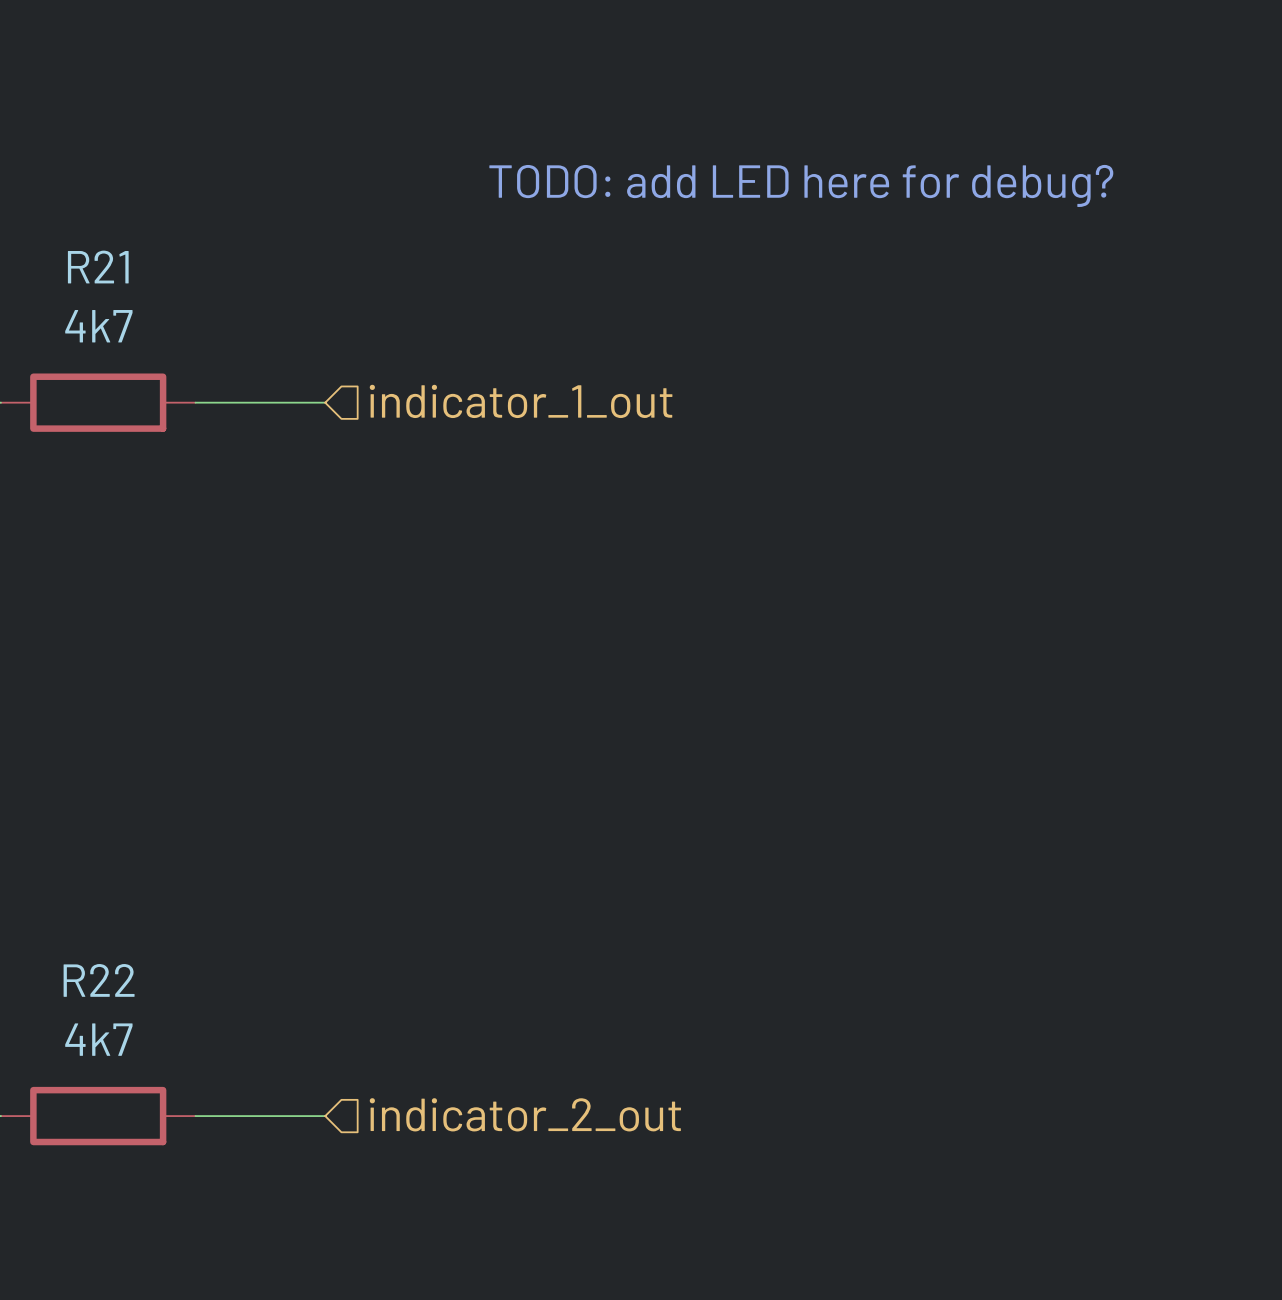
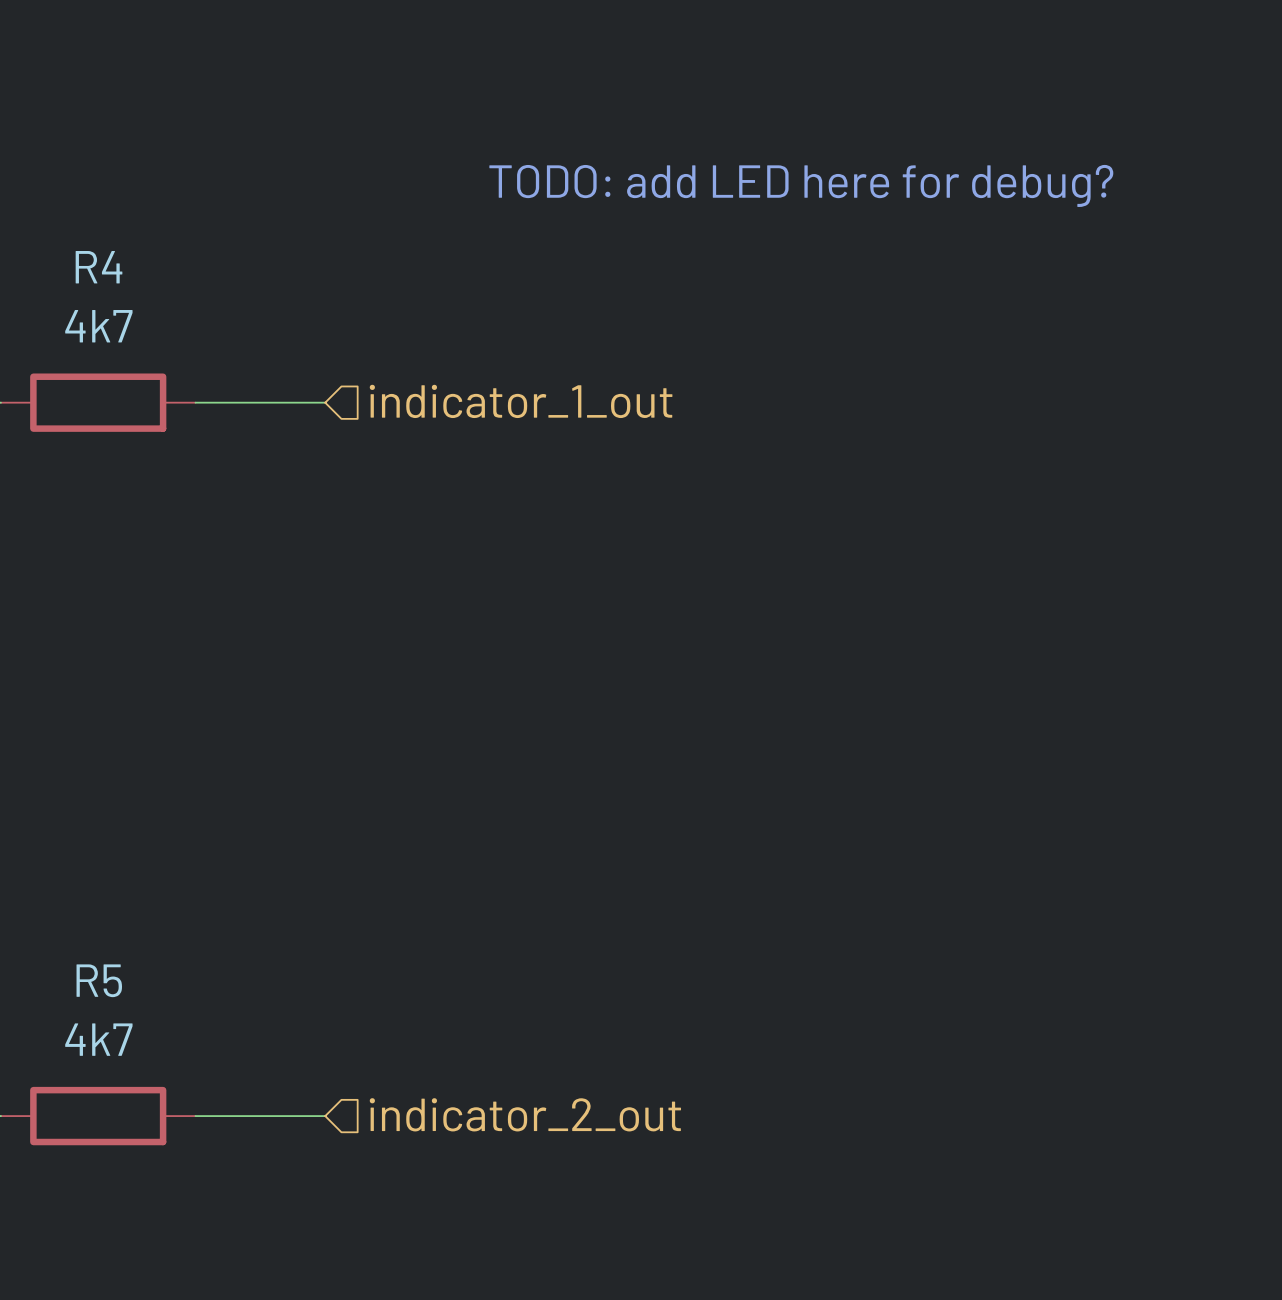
R21 name: R21 (98, 267) -> R4 (99, 267)
R22 name: R22 (99, 980) -> R5 (99, 980)

